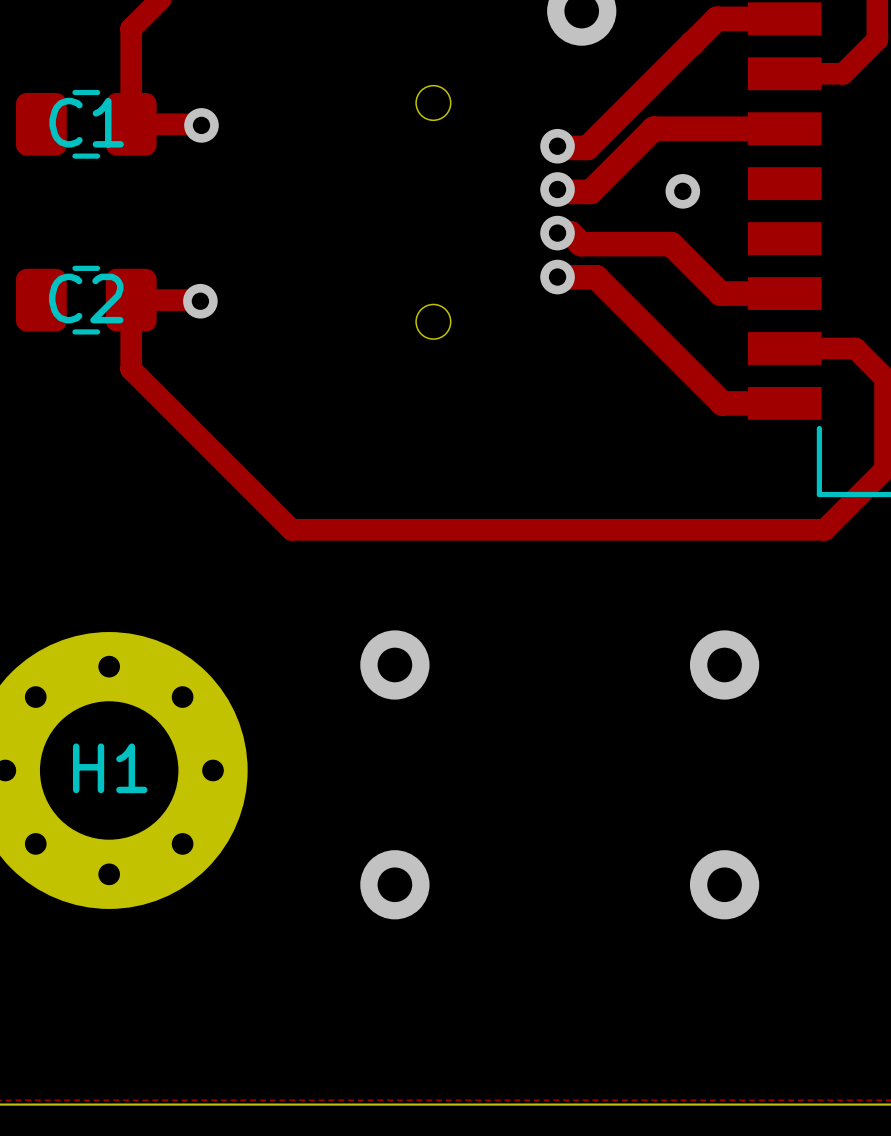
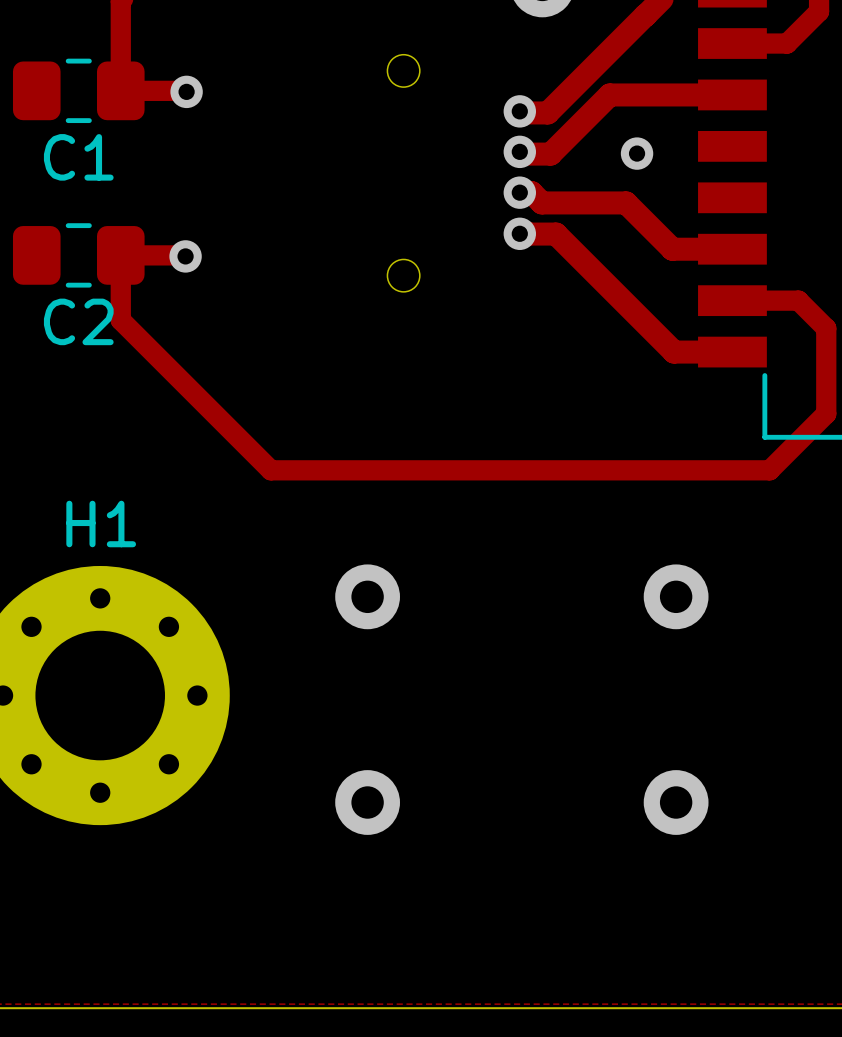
C1 name position: C1 (86, 122) -> C1 (78, 157)
C2 name position: C2 (86, 298) -> C2 (78, 321)
H1 name position: H1 (110, 768) -> H1 (101, 523)

